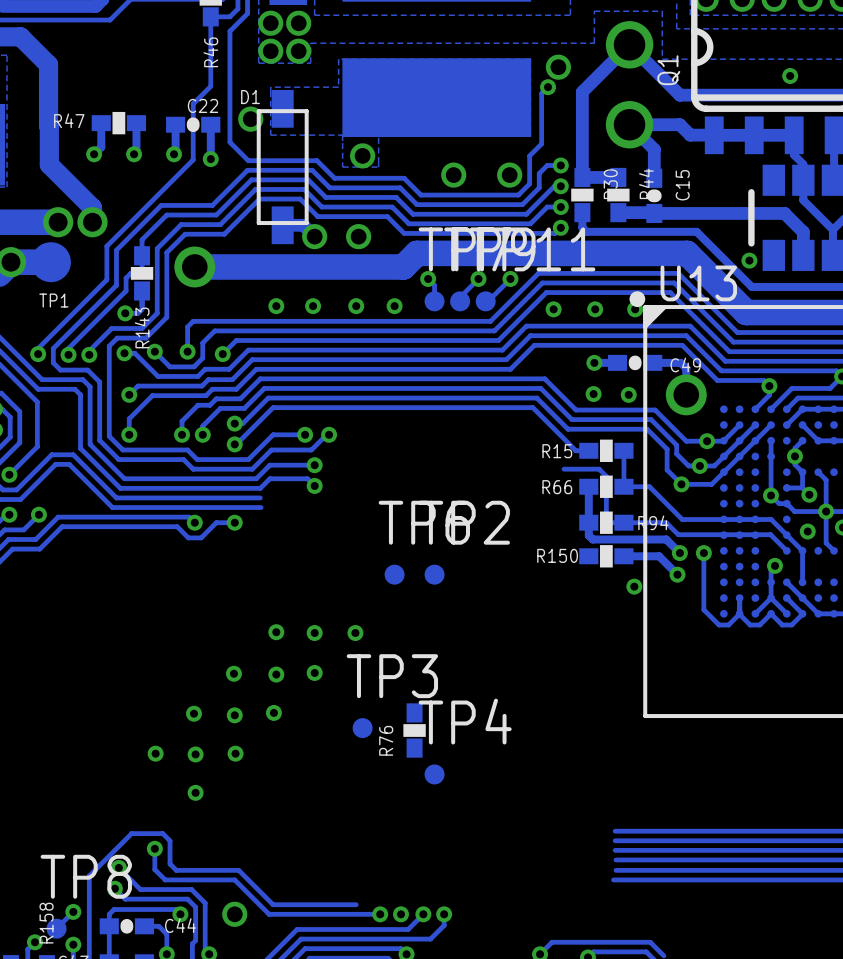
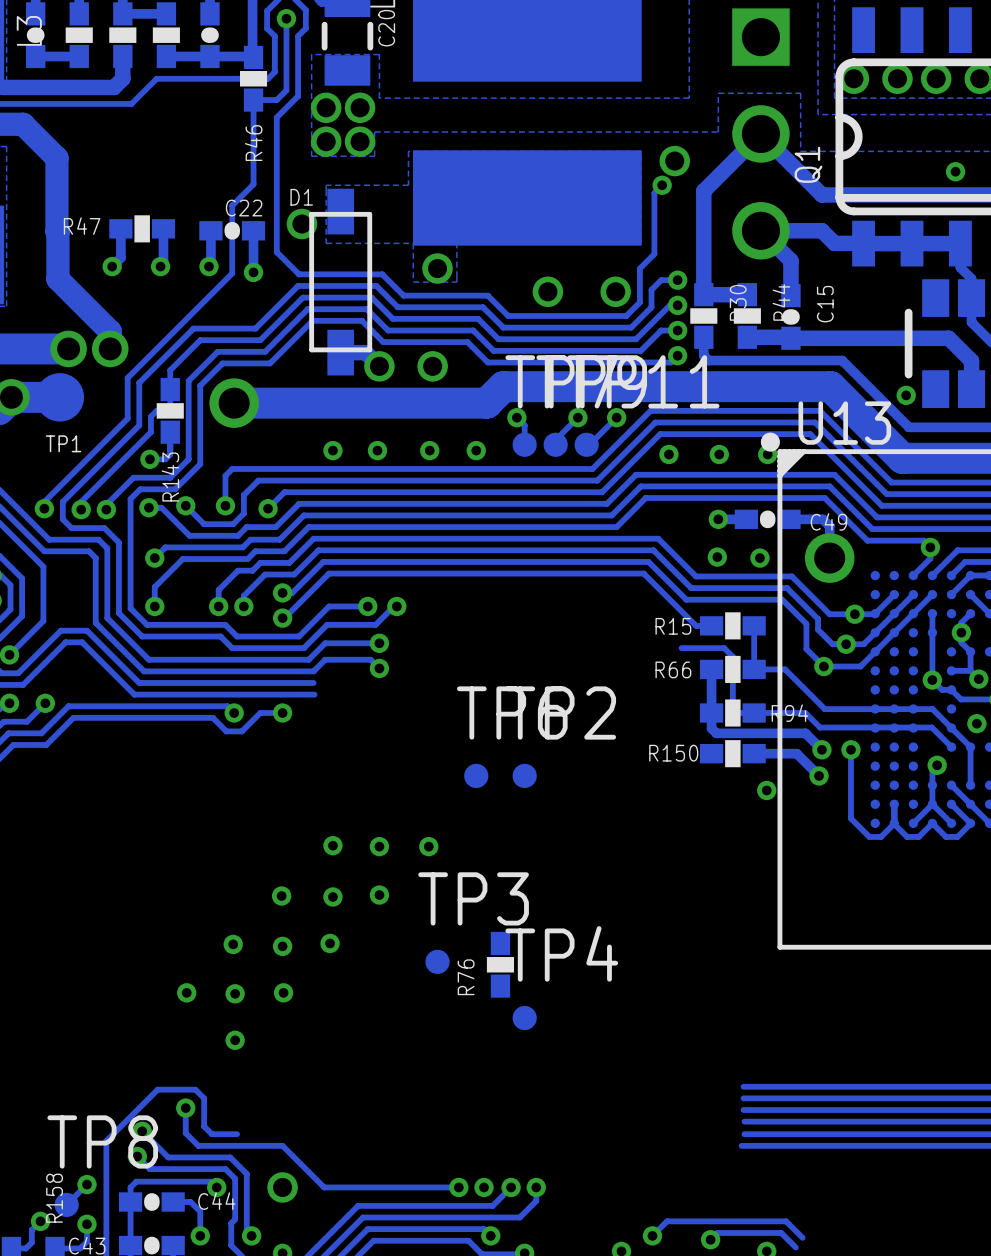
track: (197, 870) (238, 870) (273, 904) (356, 904) -> none

